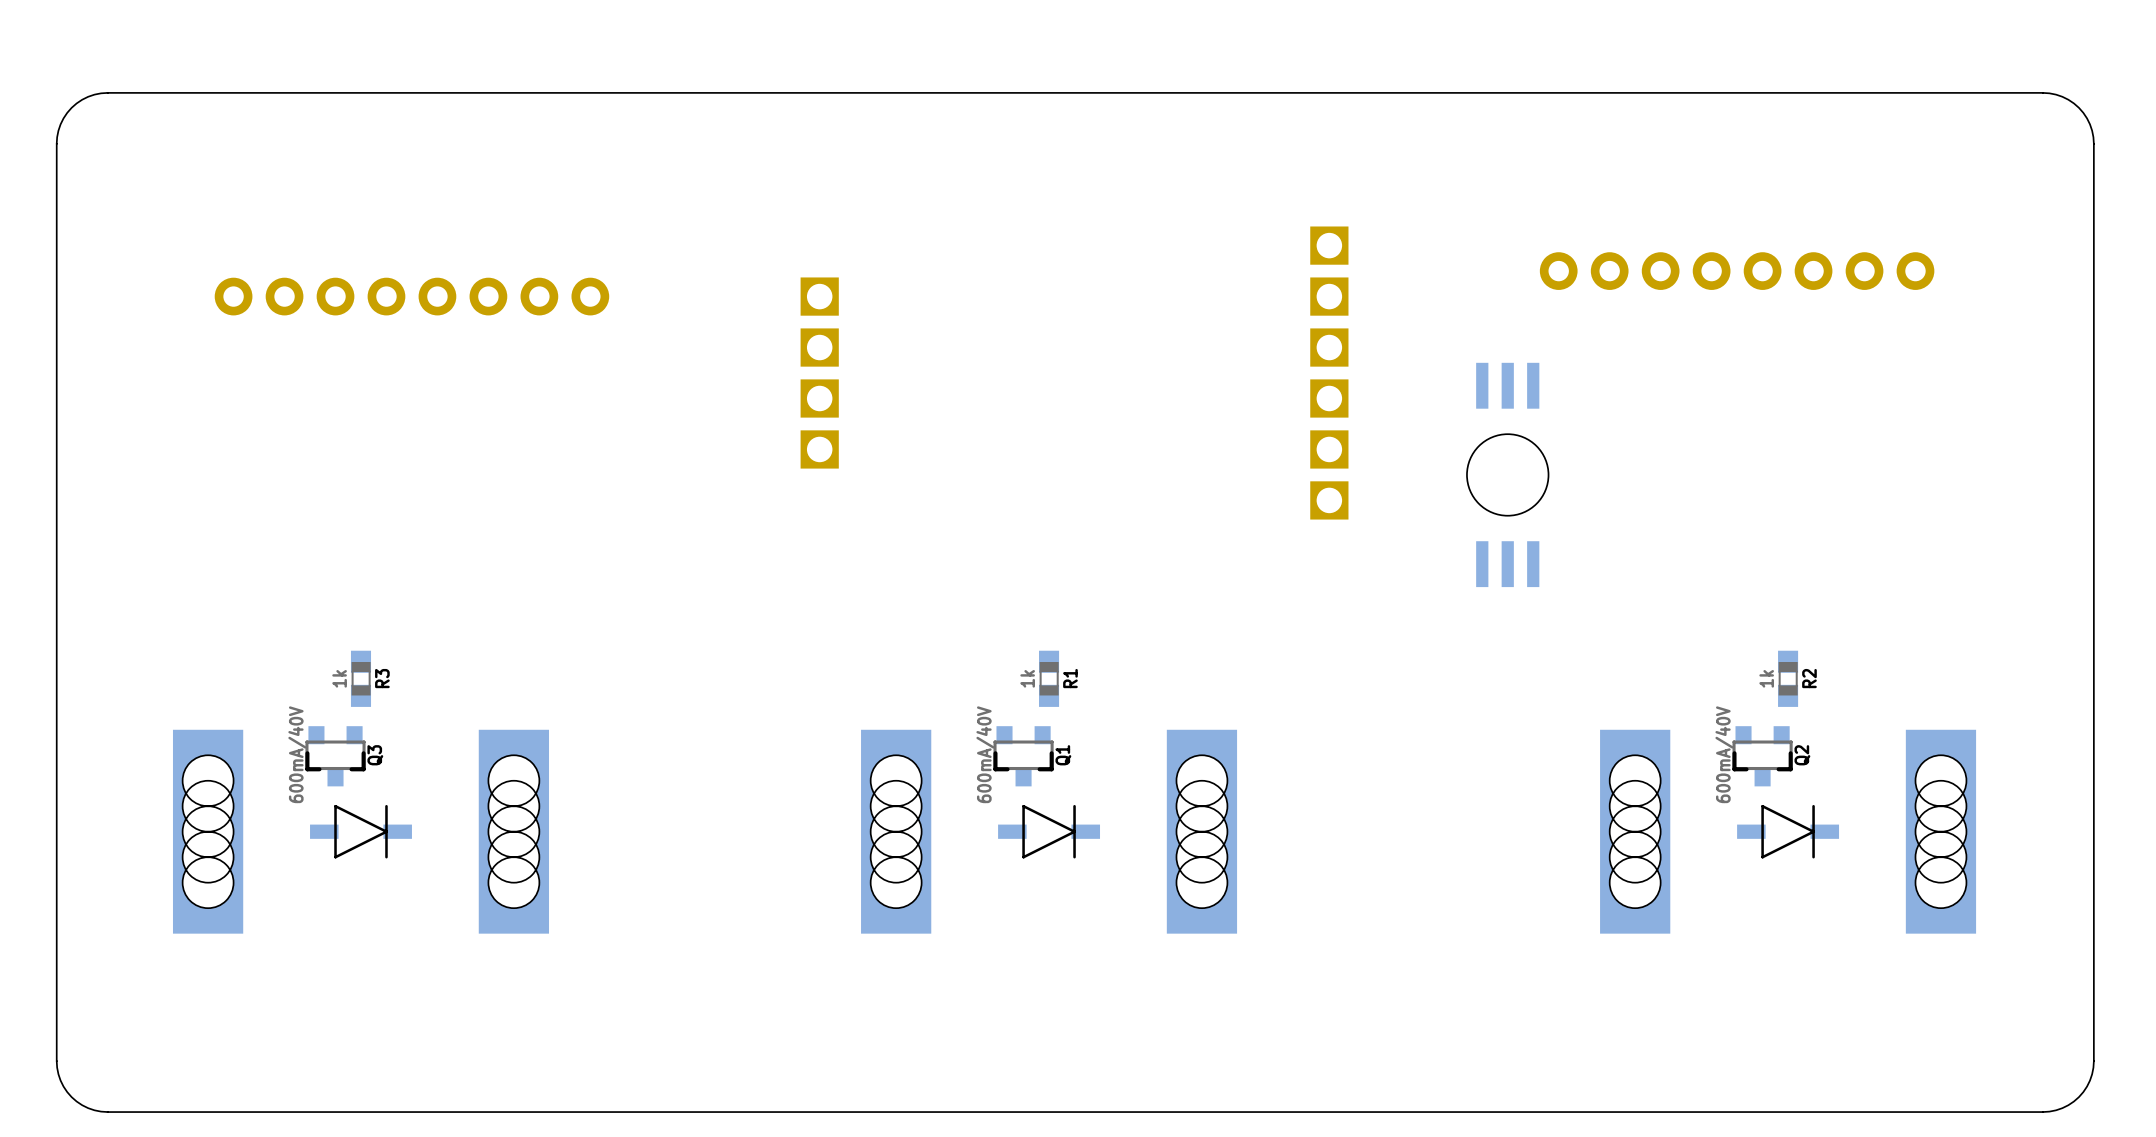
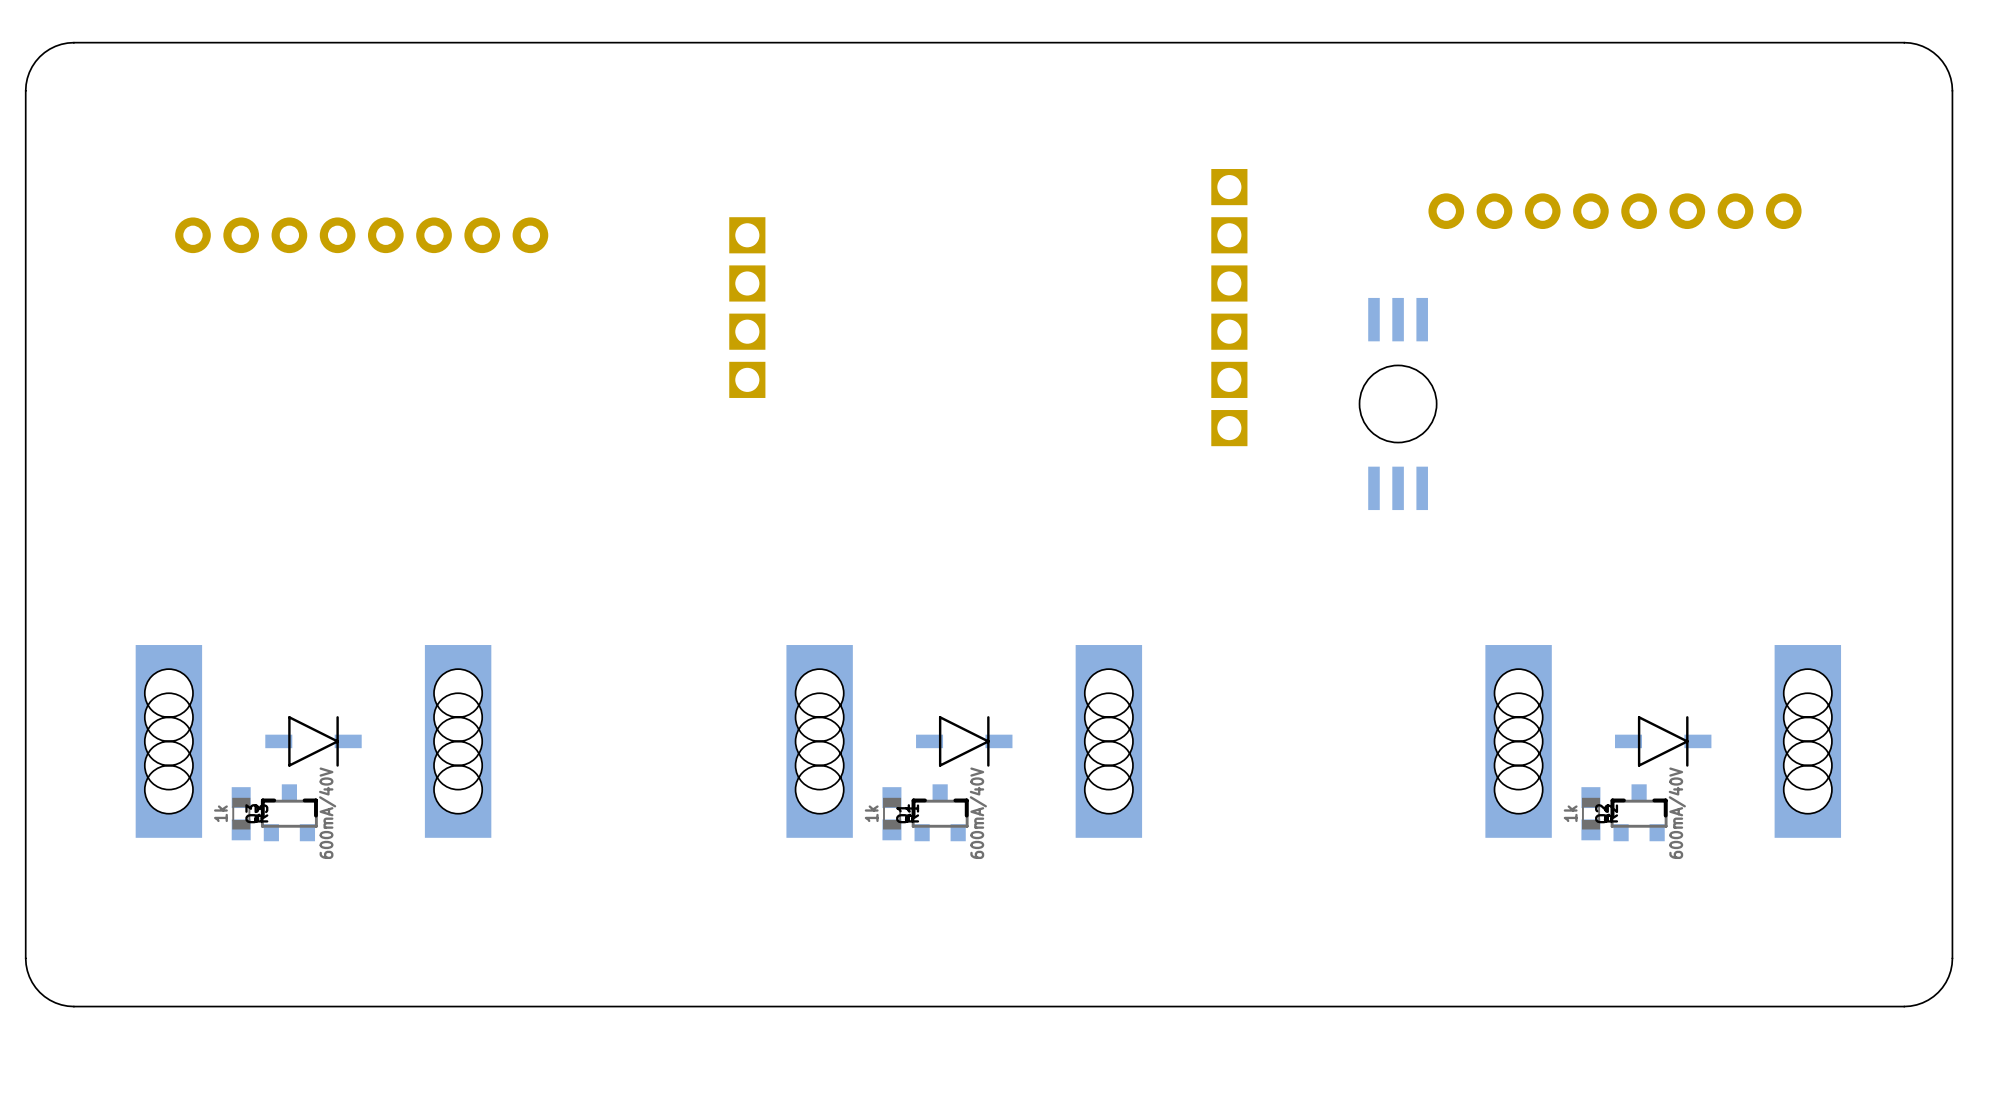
R3 position: (360, 678) -> (241, 813)
R1 position: (1049, 678) -> (891, 813)
R2 position: (1788, 678) -> (1590, 813)
Q3 rotation: 0° (335, 756) -> 180° (289, 812)
Q3 position: (335, 756) -> (289, 812)
Q1 rotation: 0° (1023, 756) -> 180° (940, 812)
Q1 position: (1023, 756) -> (940, 812)
Q2 rotation: 0° (1762, 756) -> 180° (1639, 812)
Q2 position: (1762, 756) -> (1639, 812)

